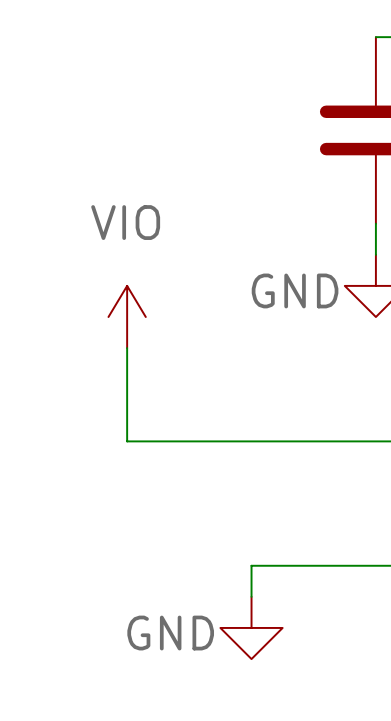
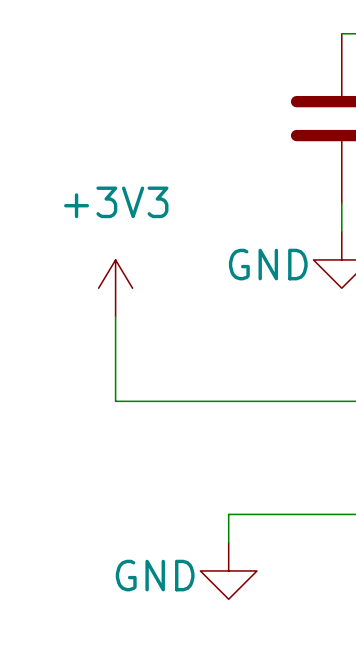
power symbol: VIO (127, 317) -> +3V3 (115, 288)

